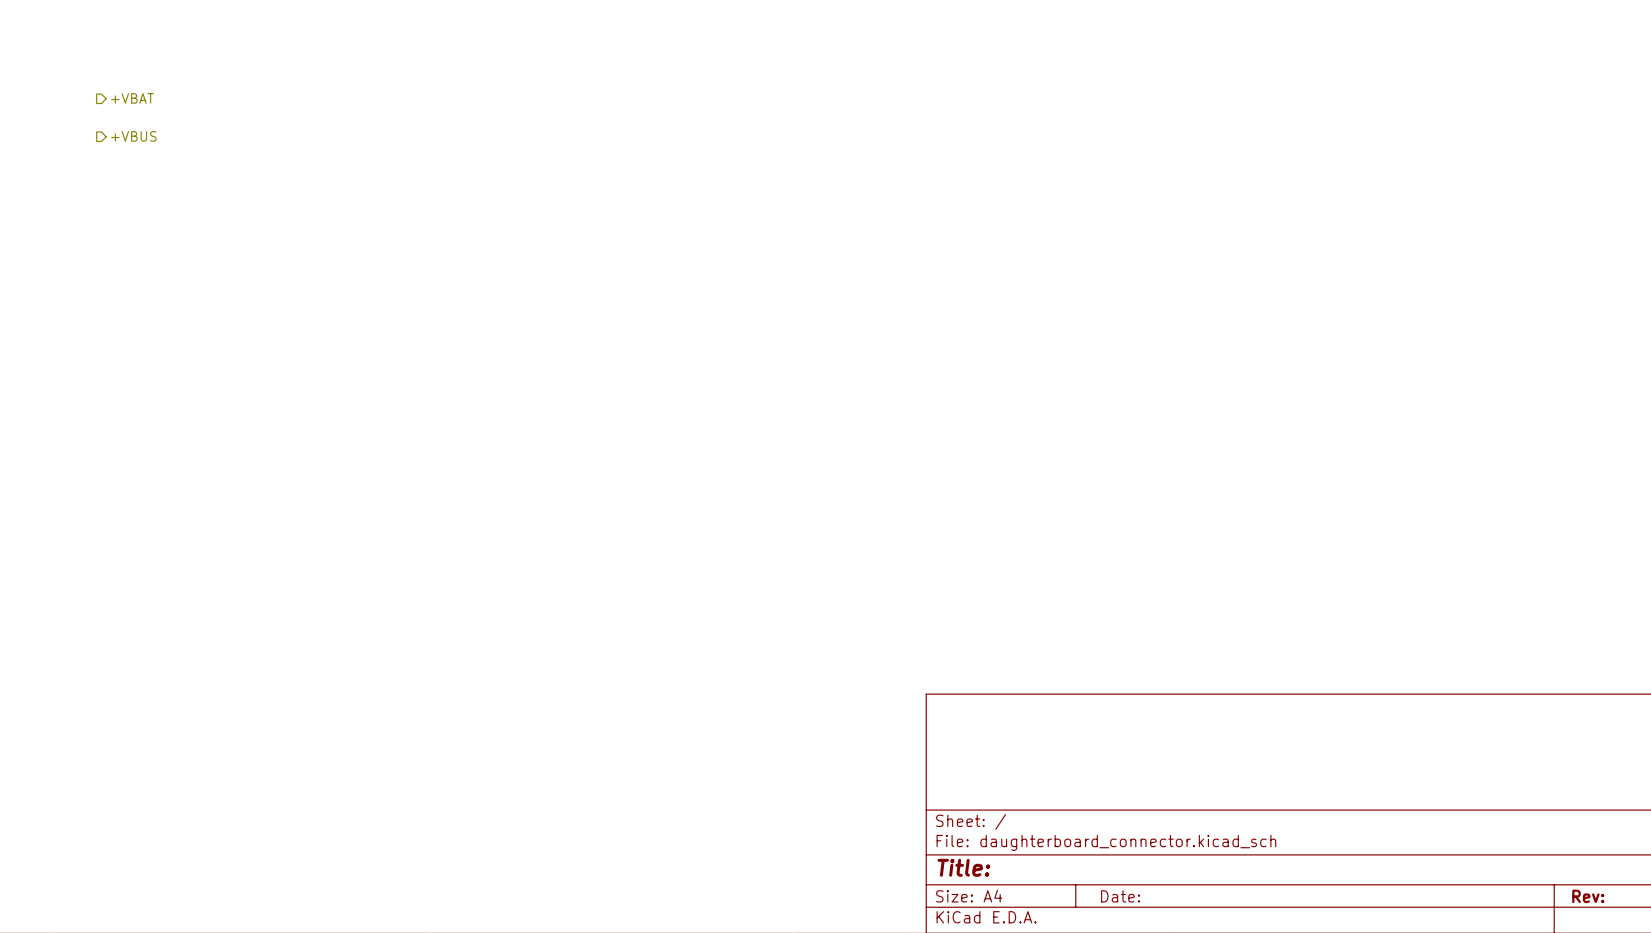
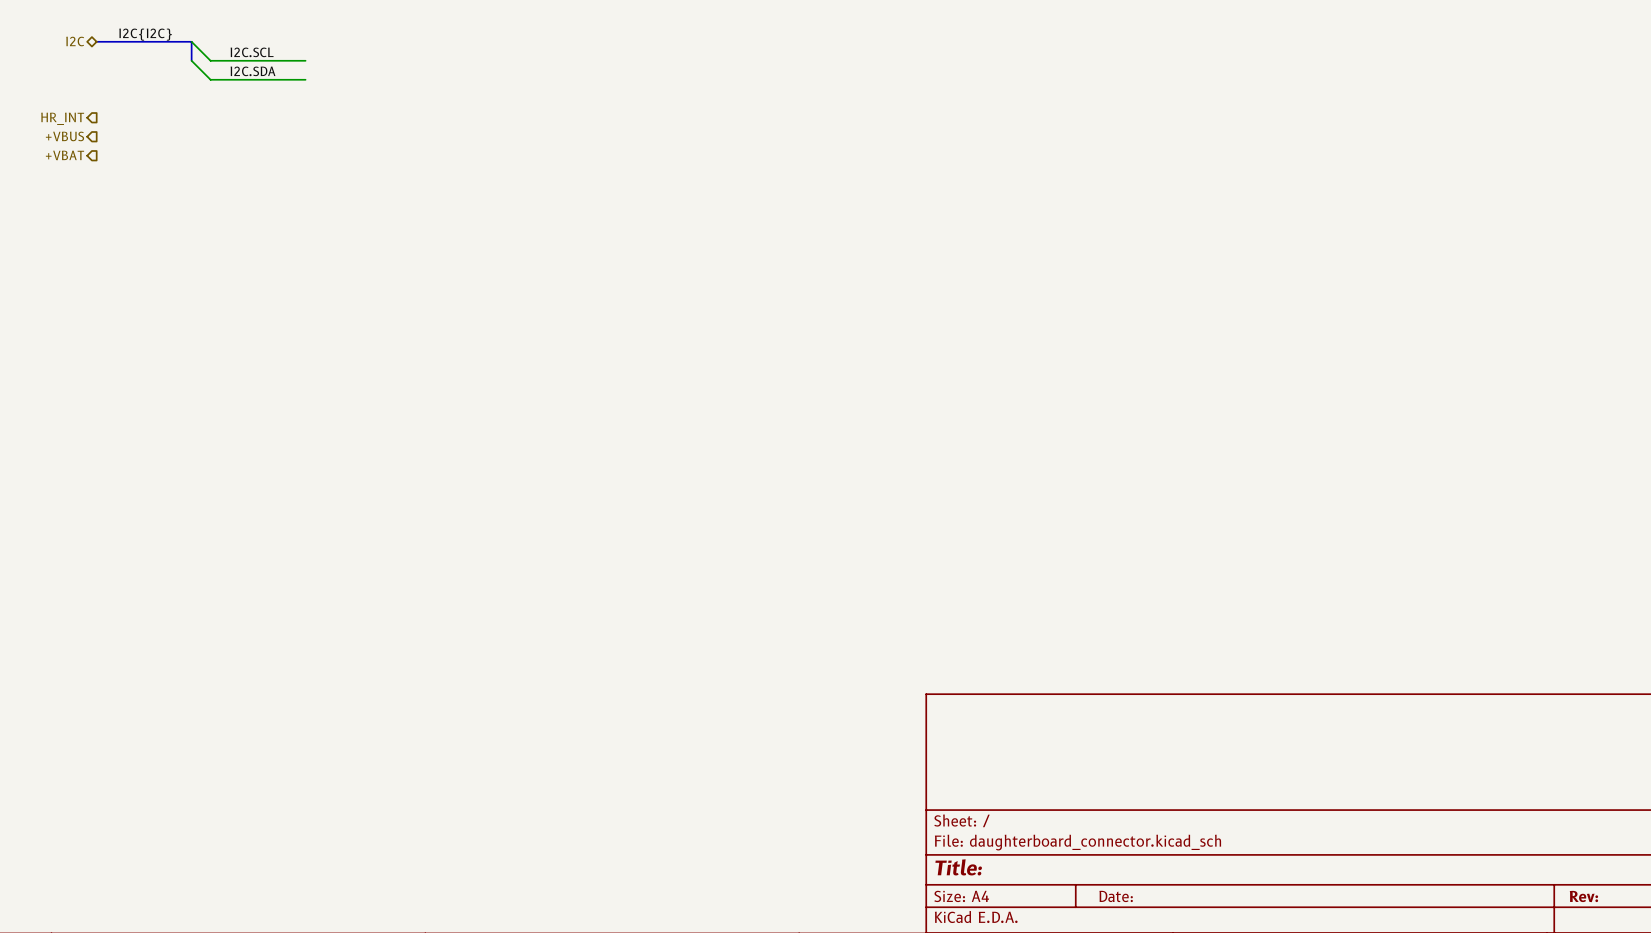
label: none -> I2C{I2C} (145, 34)
hierarchical label: none -> I2C (75, 41)
bus: none -> (96, 41) (191, 41) (191, 60)
wire: none -> (191, 41) (210, 60) (305, 60)
label: none -> I2C.SCL (252, 52)
wire: none -> (191, 60) (210, 79) (305, 79)
label: none -> I2C.SDA (253, 71)
hierarchical label rotation: 0° (132, 98) -> 180° (64, 155)
hierarchical label position: +VBAT (132, 98) -> +VBAT (64, 155)
hierarchical label: none -> HR_INT (62, 118)
hierarchical label rotation: 0° (133, 136) -> 180° (64, 136)
hierarchical label position: +VBUS (133, 136) -> +VBUS (64, 136)

